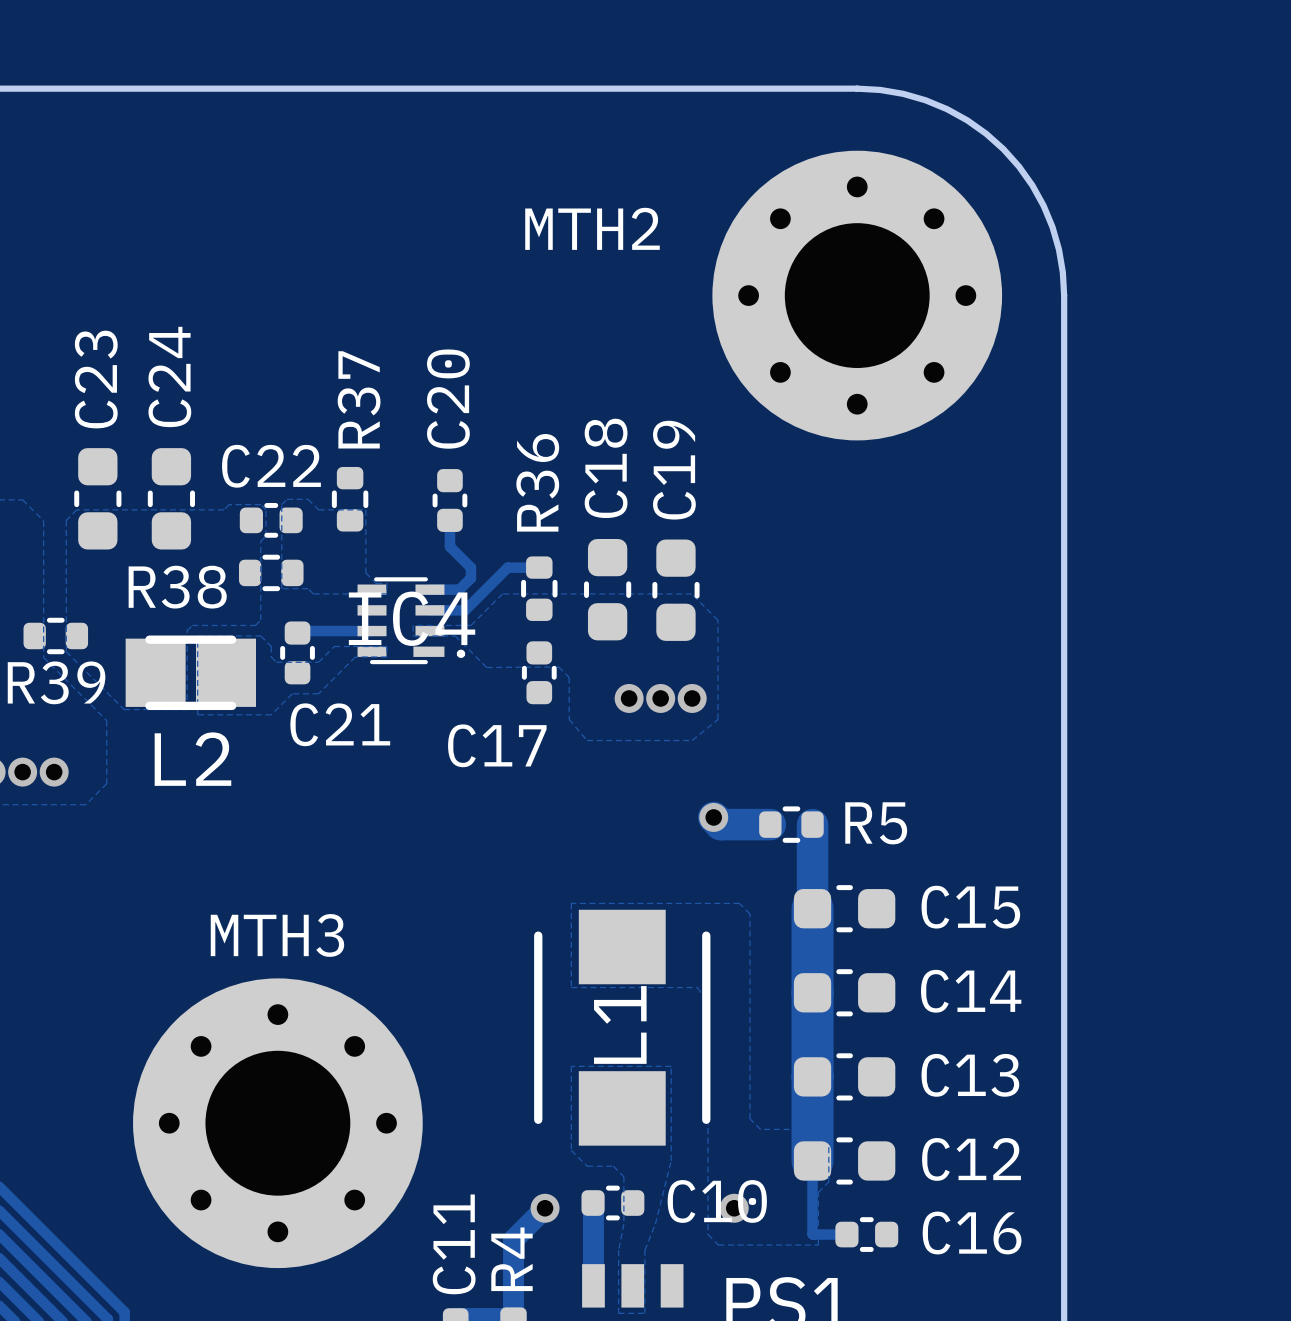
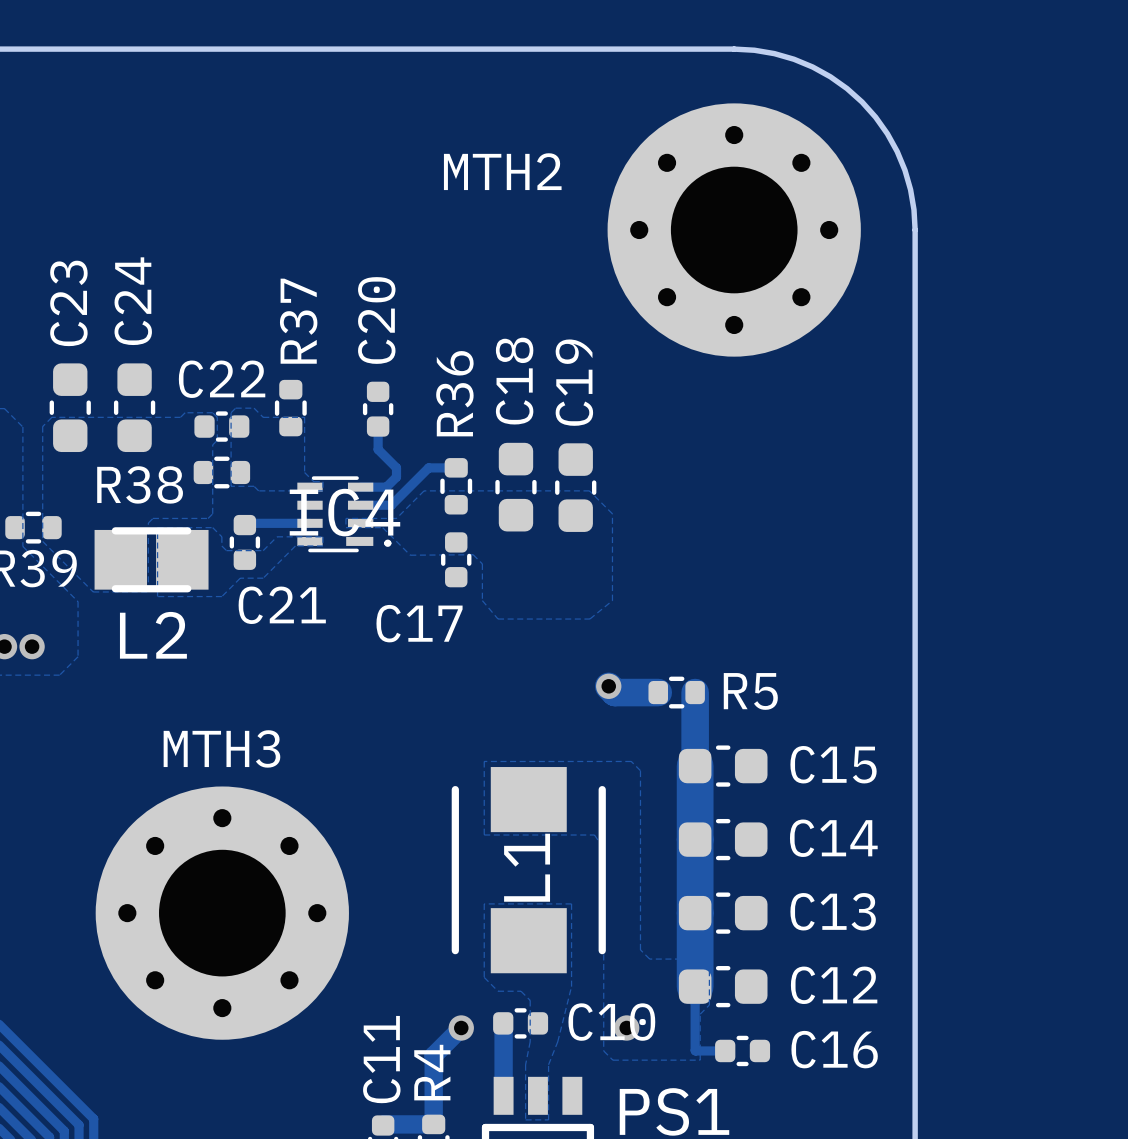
via: (629, 698) -> none
via: (660, 698) -> none
via: (692, 698) -> none
MTH3 position: (277, 1123) -> (222, 913)

